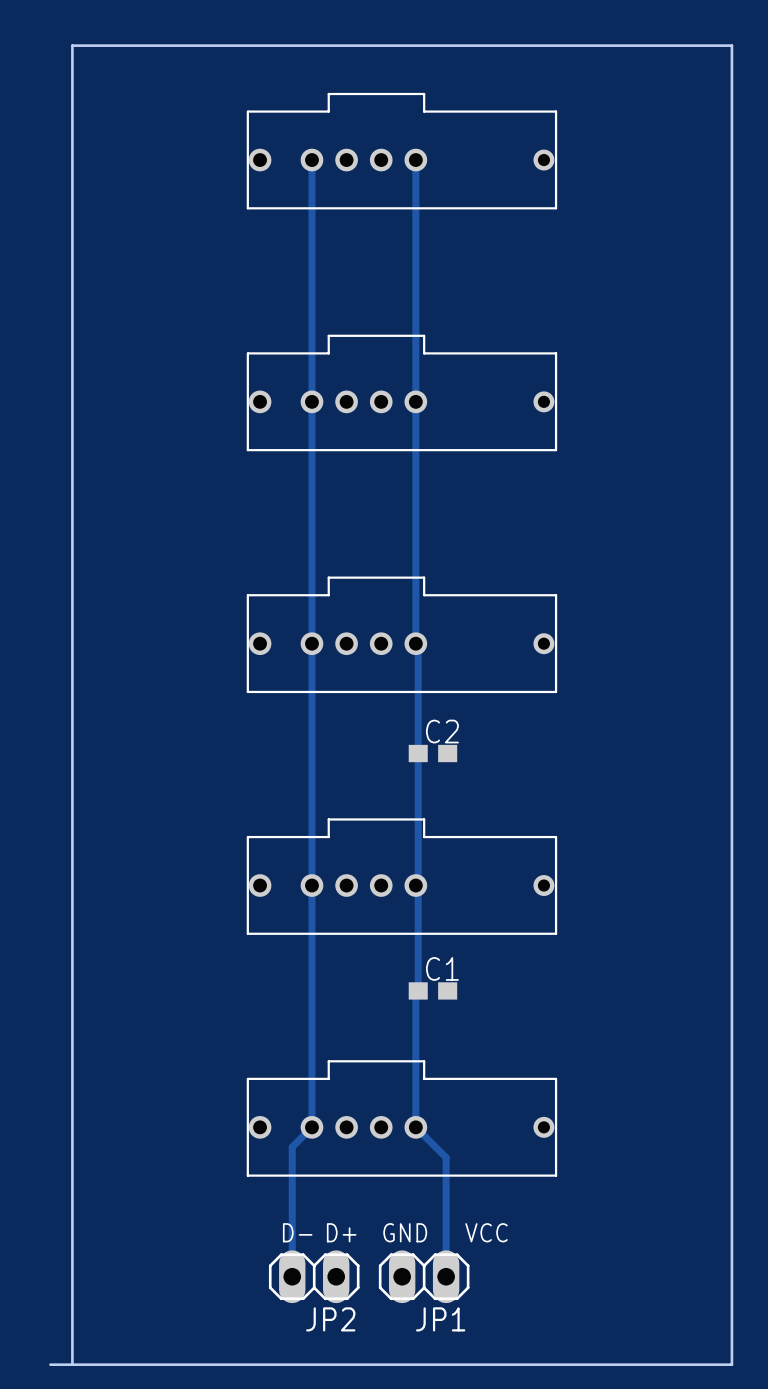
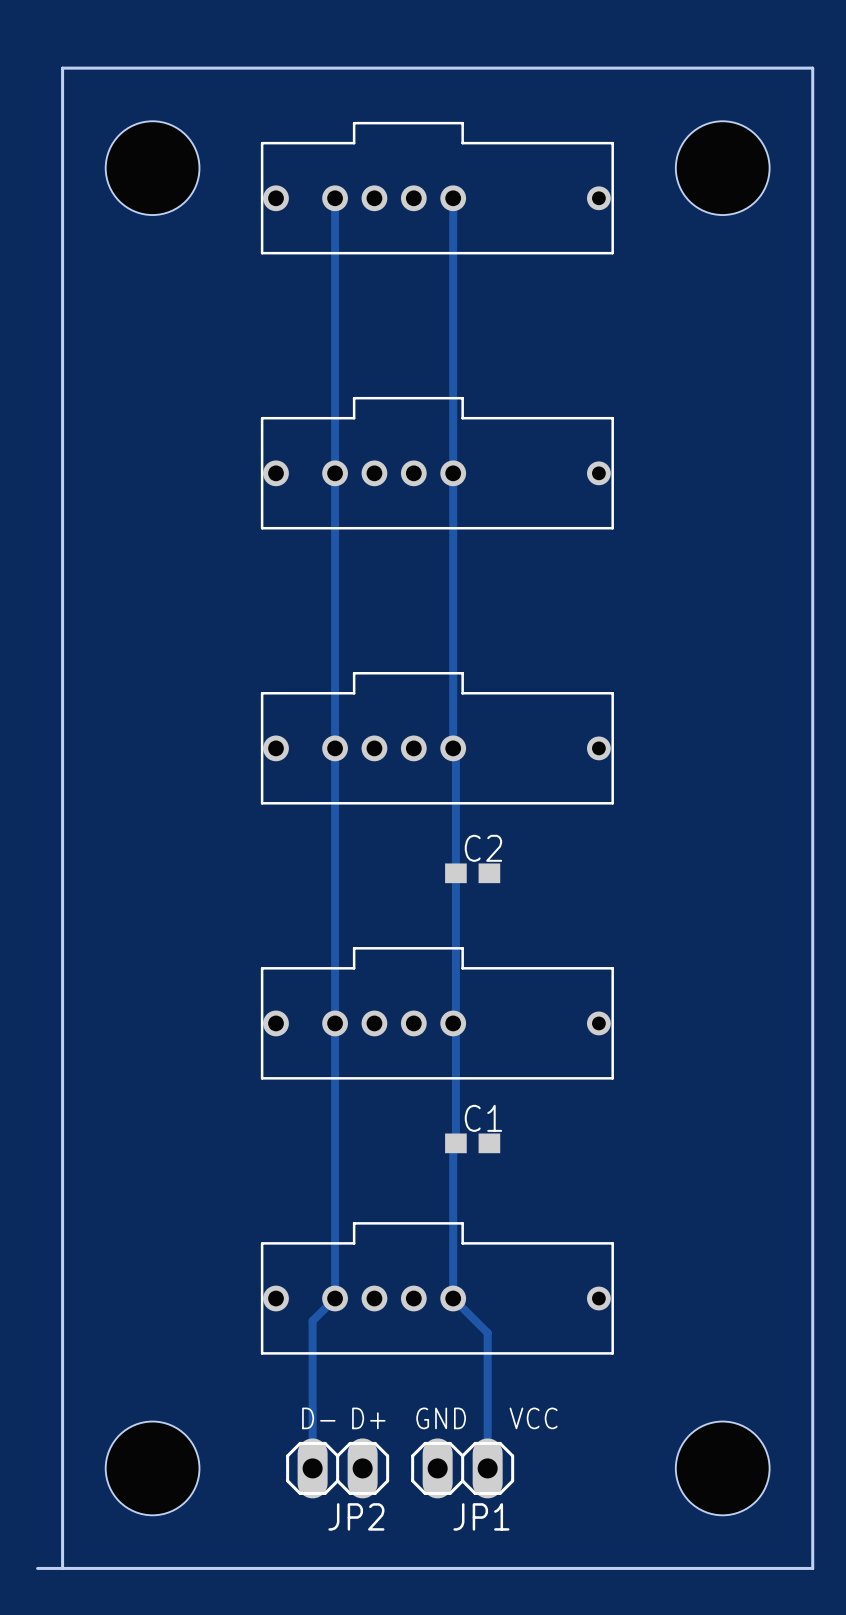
hole: none -> (152, 168)
hole: none -> (722, 168)
hole: none -> (152, 1468)
hole: none -> (722, 1468)

